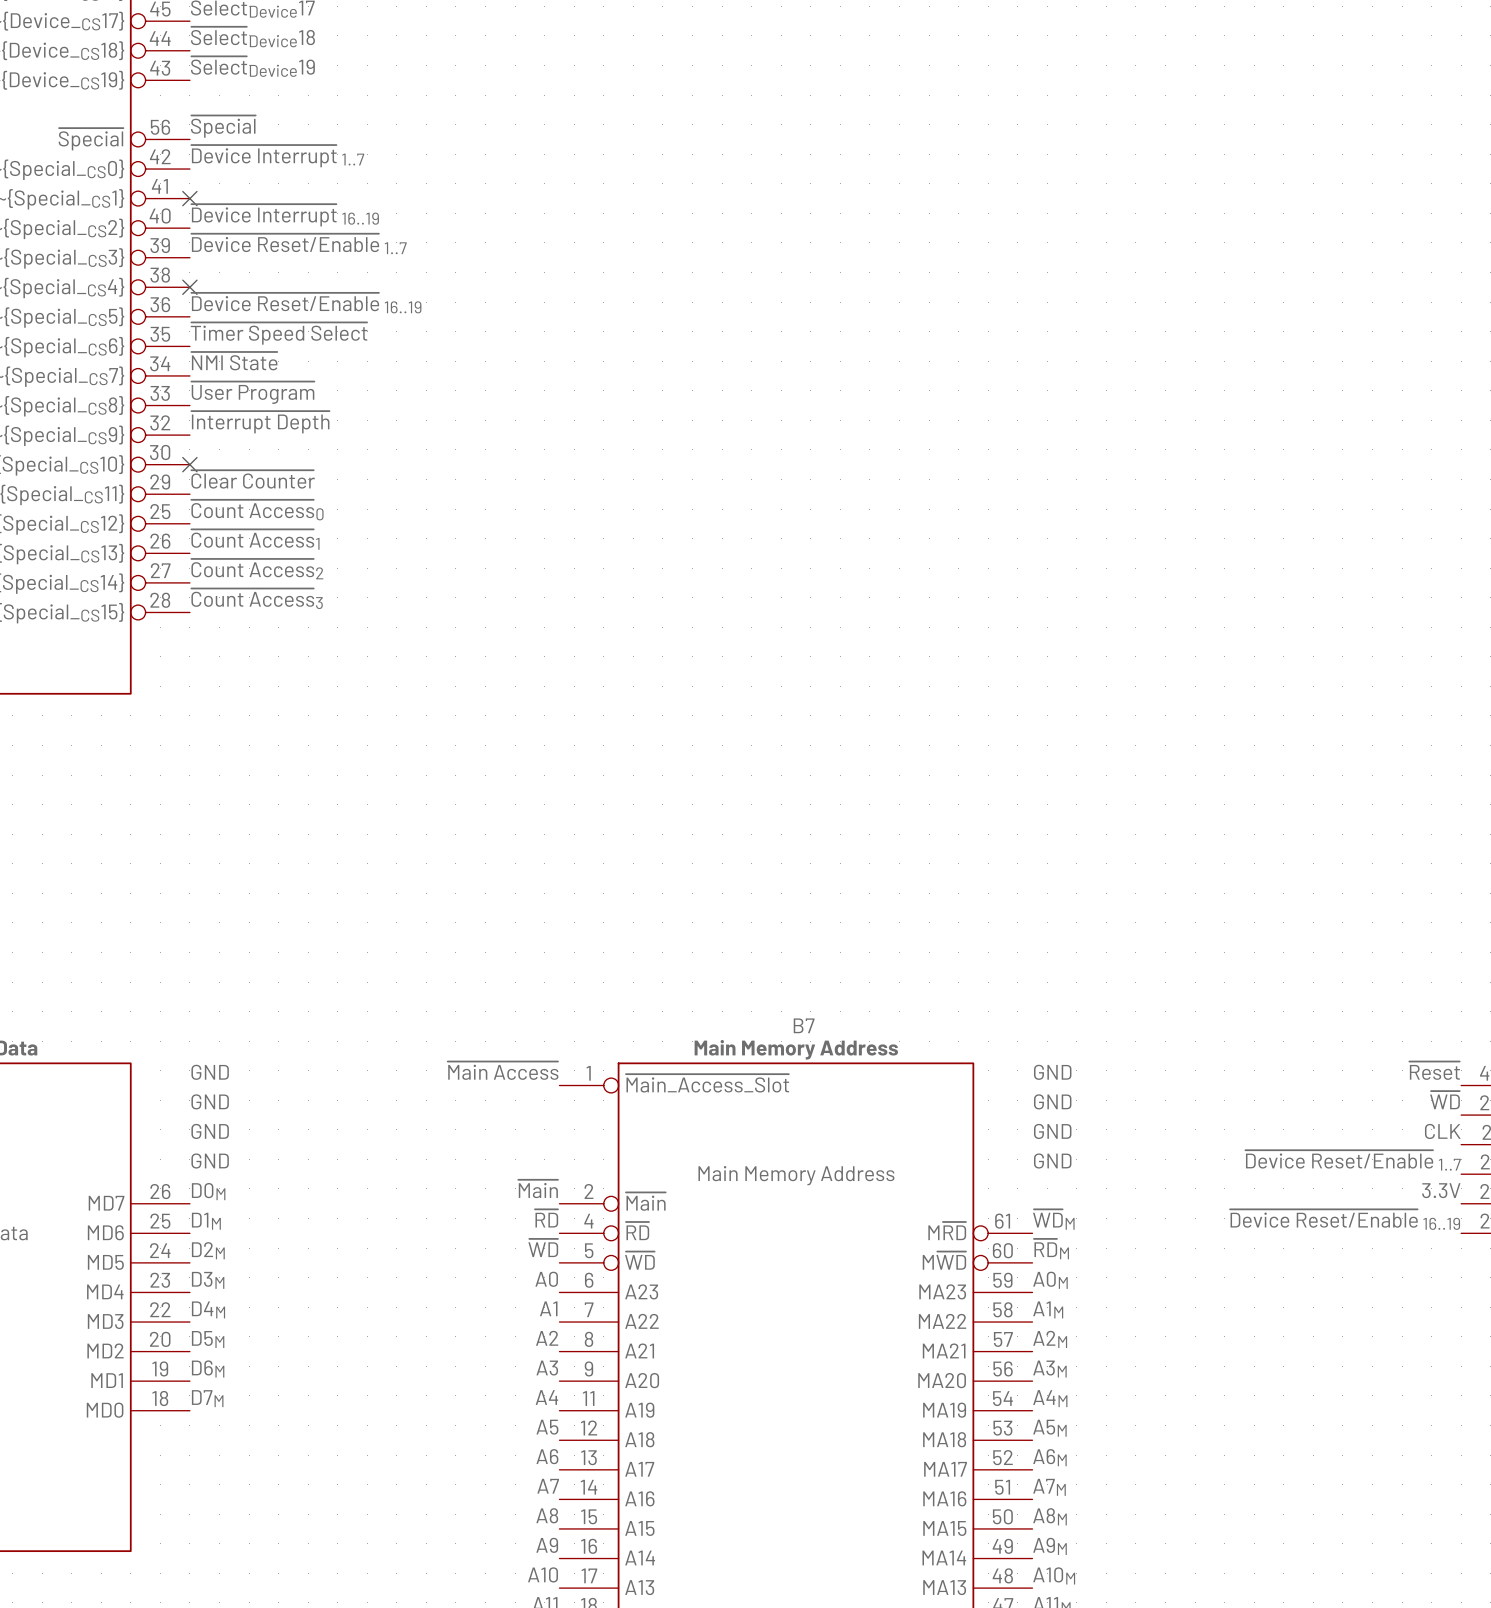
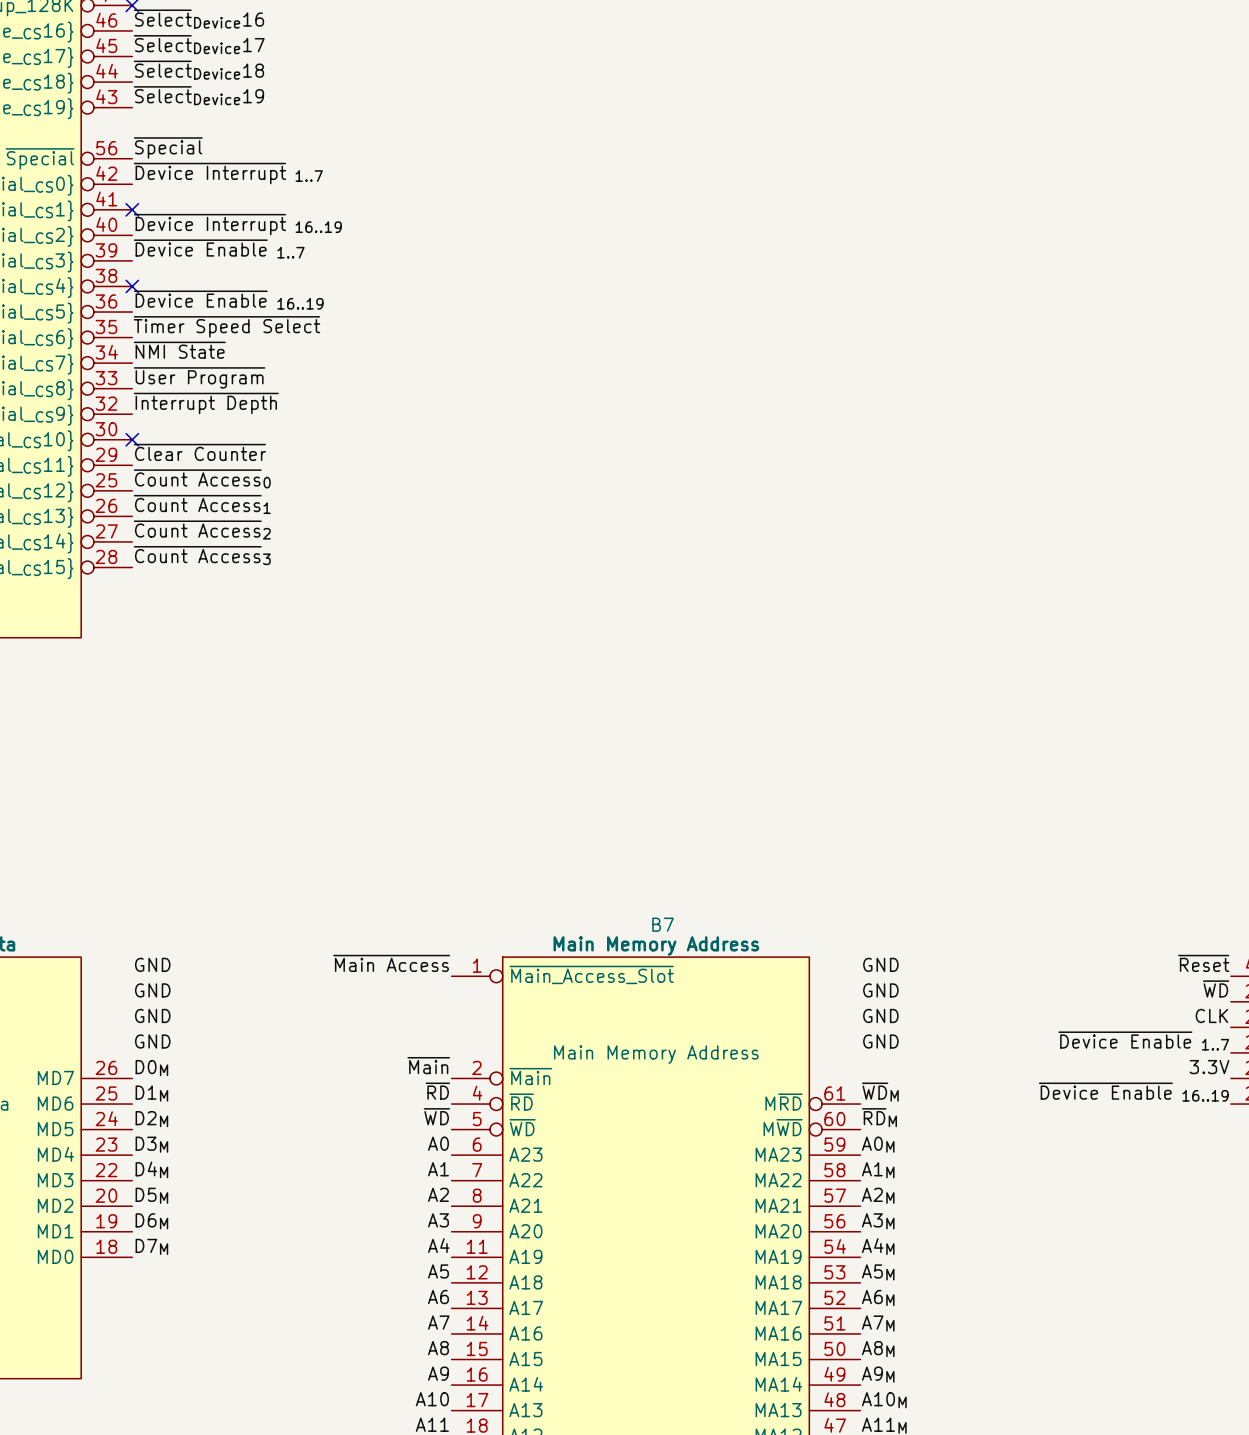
label: ~{Device Reset/Enable} 1..7 (299, 243) -> ~{Device Enable} 1..7 (219, 249)
label: ~{Device Reset/Enable} 16..19 (306, 303) -> ~{Device Enable} 16..19 (228, 300)
label: ~{Device Reset/Enable} 1..7 (1353, 1160) -> ~{Device Enable} 1..7 (1143, 1041)
label: ~{Device Reset/Enable} 16..19 (1345, 1219) -> ~{Device Enable} 16..19 (1133, 1092)

